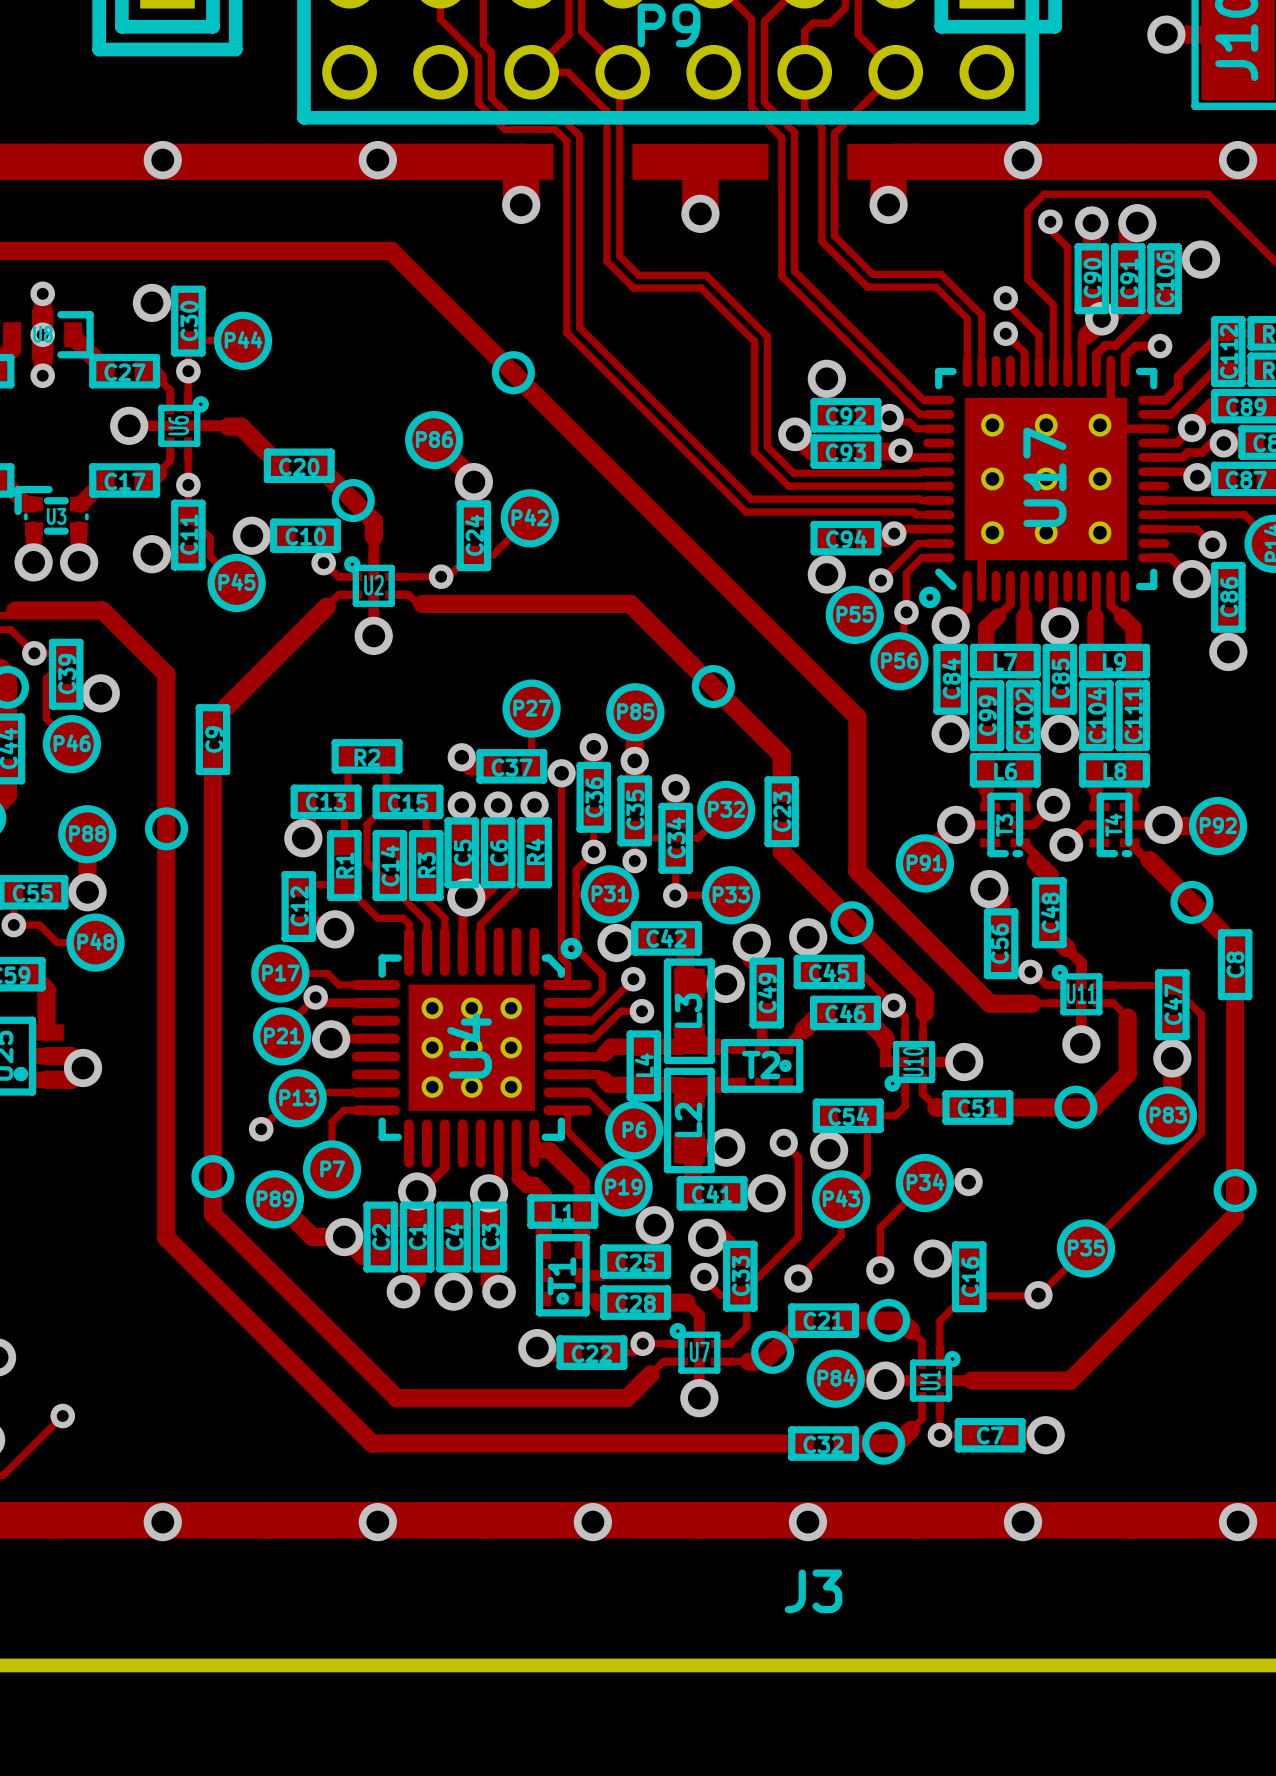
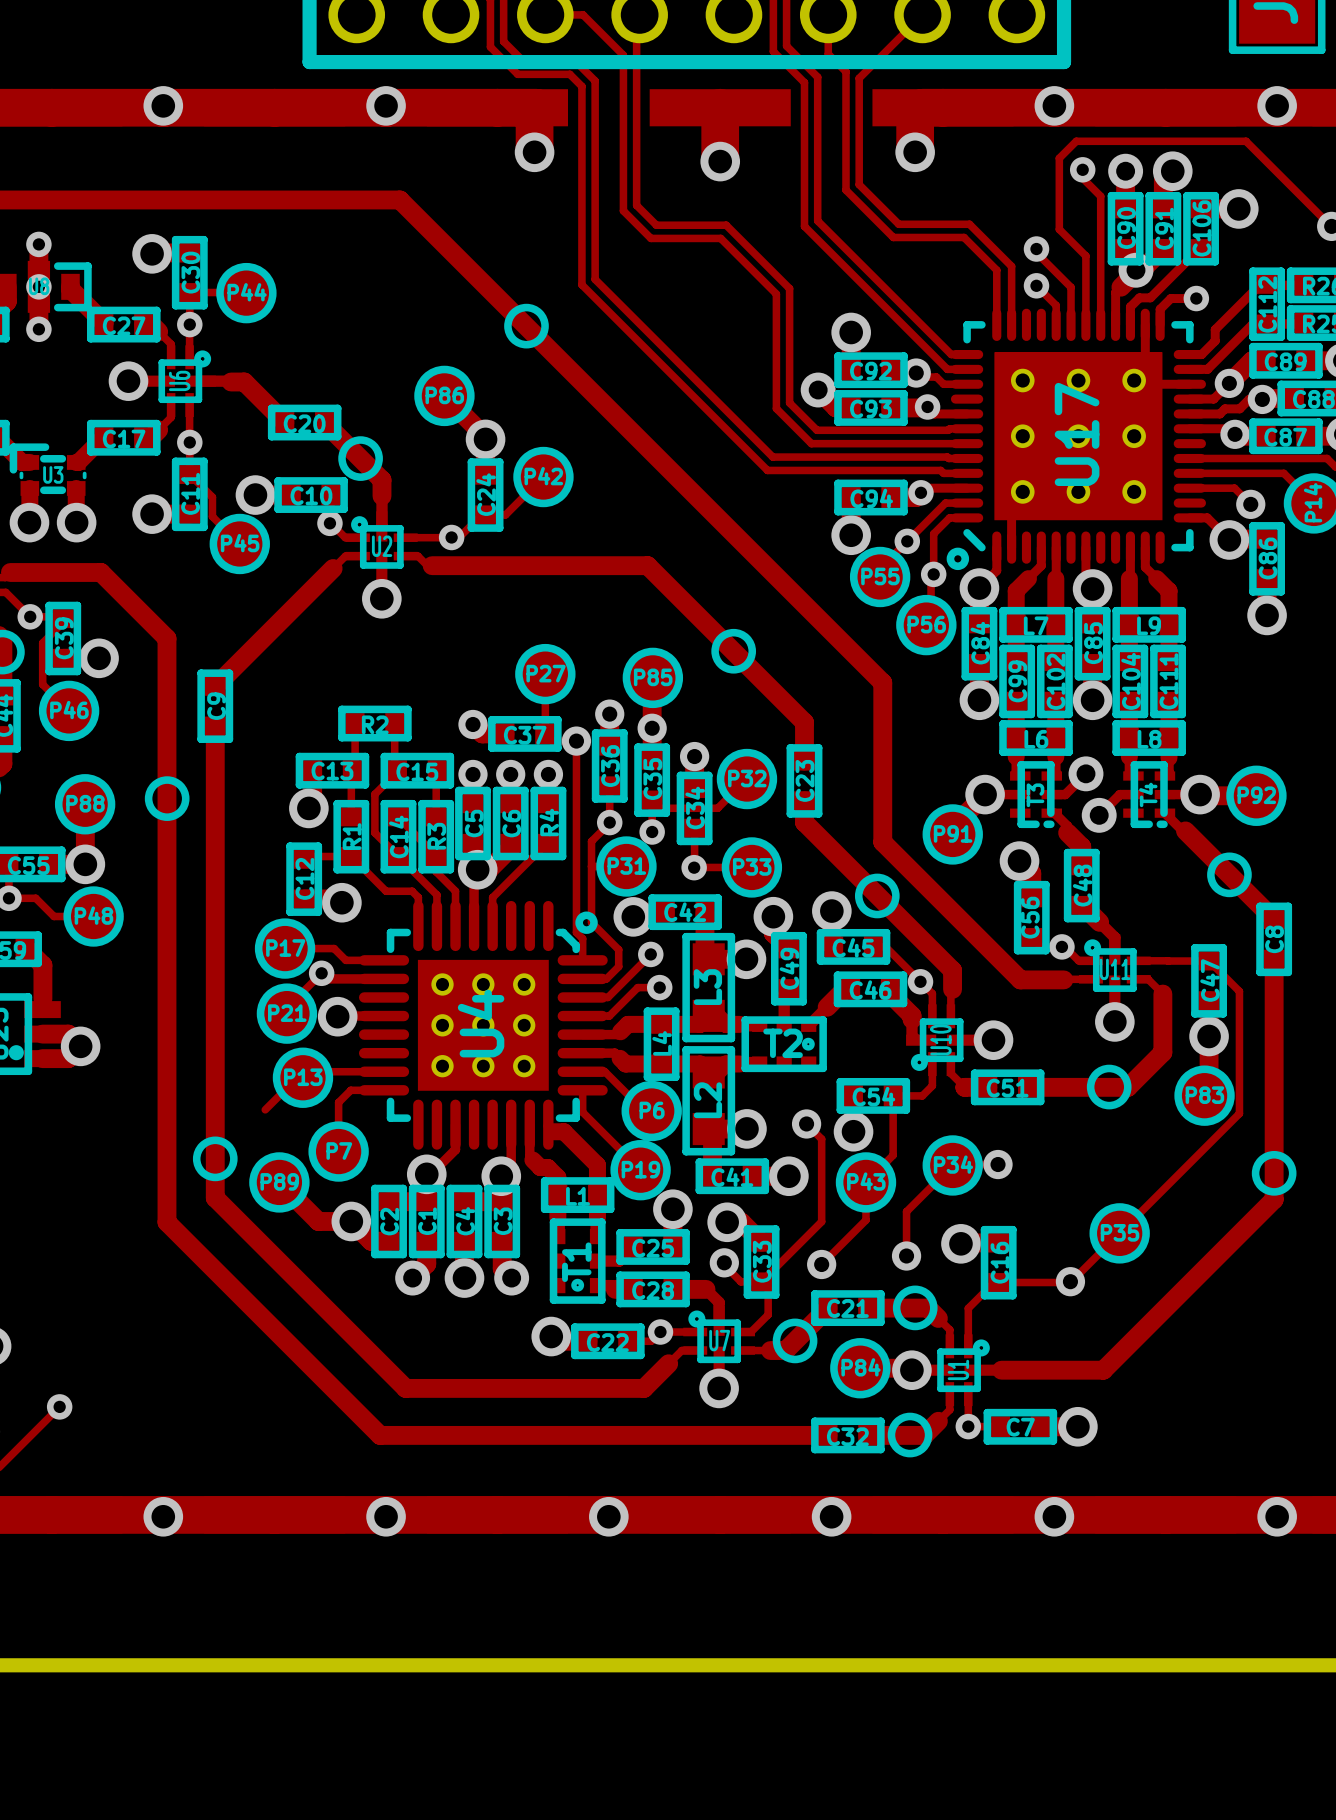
via: (261, 1129) -> none
J3: (813, 1591) -> none

